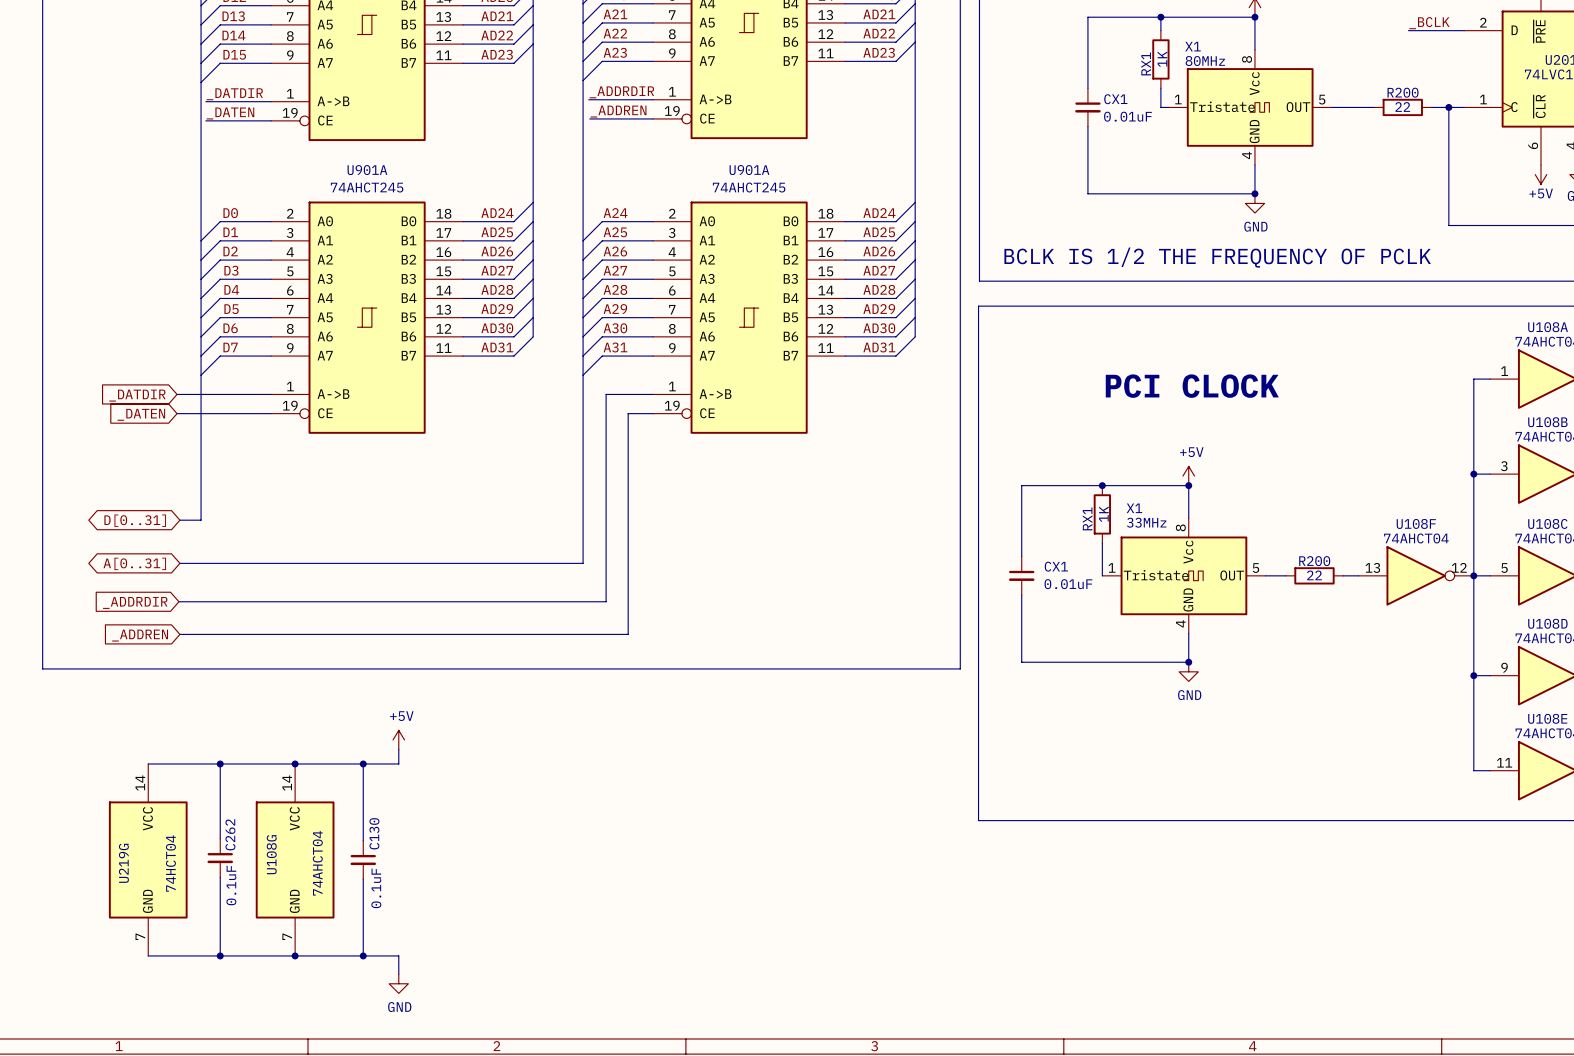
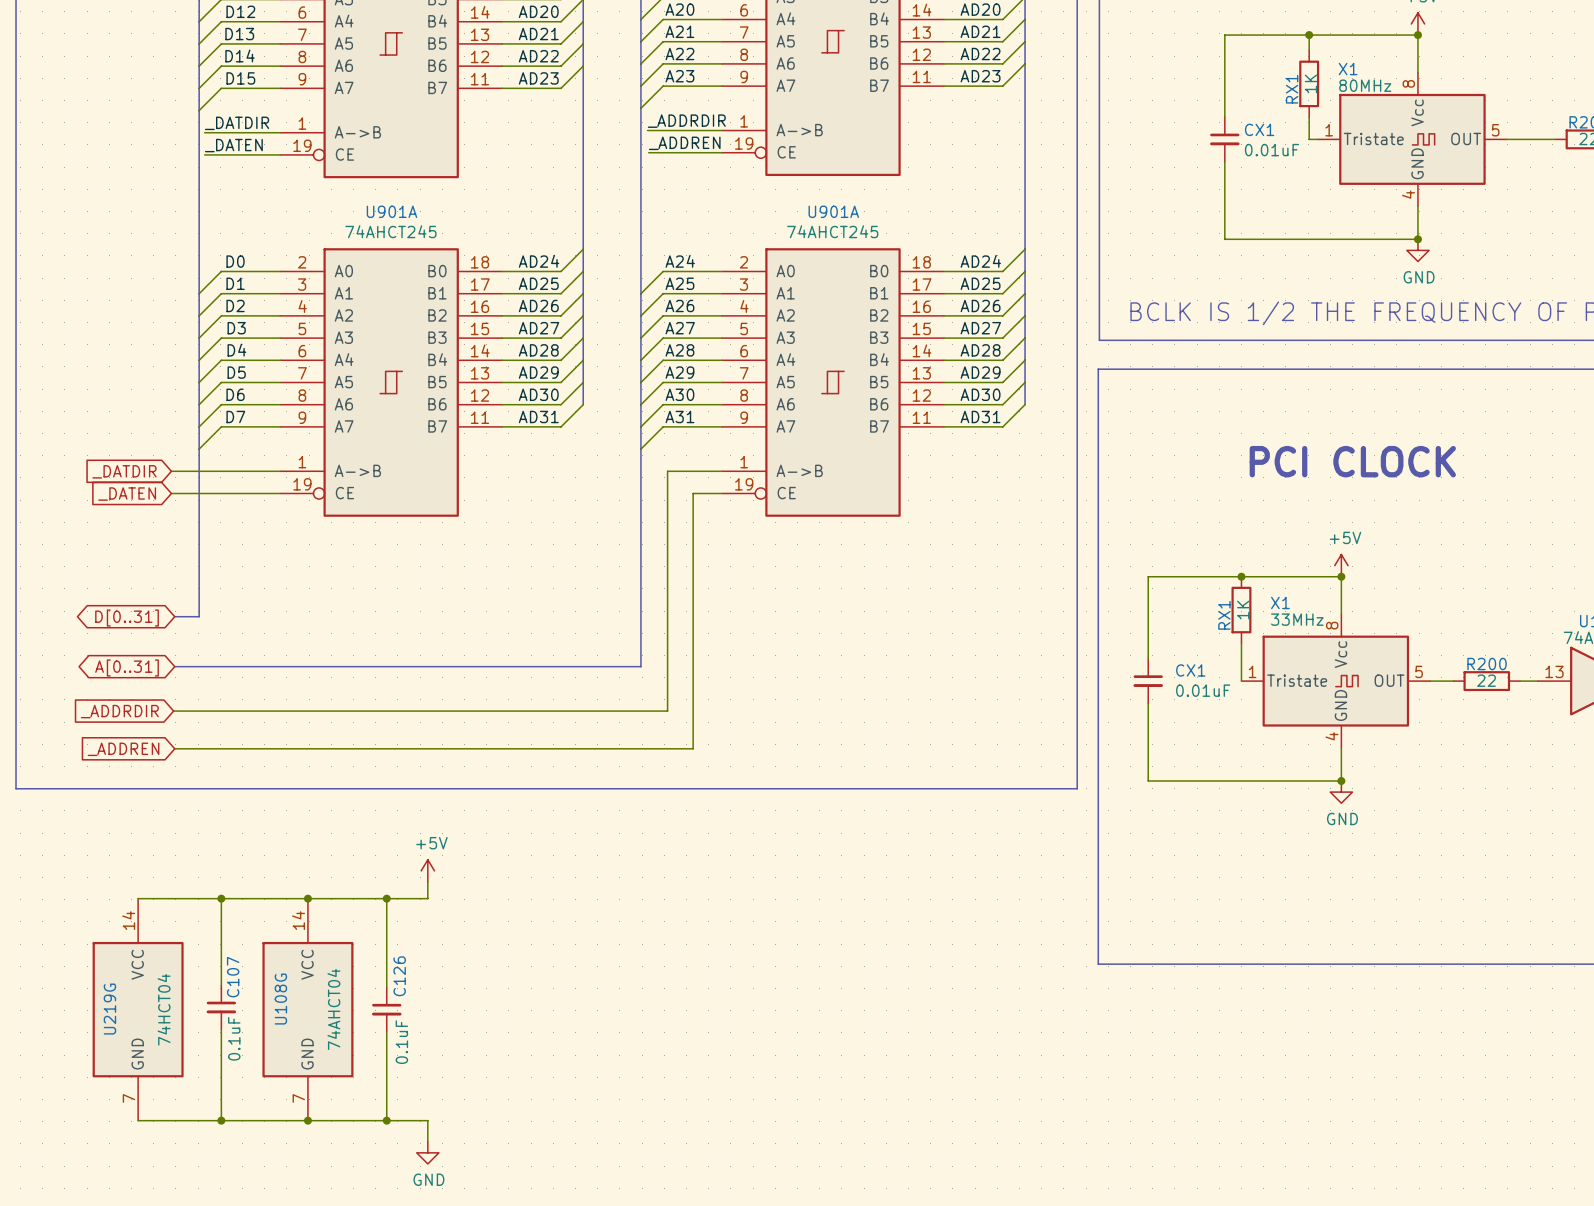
C130 name: C130 (374, 833) -> C126 (399, 976)
C262 name: C262 (230, 834) -> C107 (233, 977)

